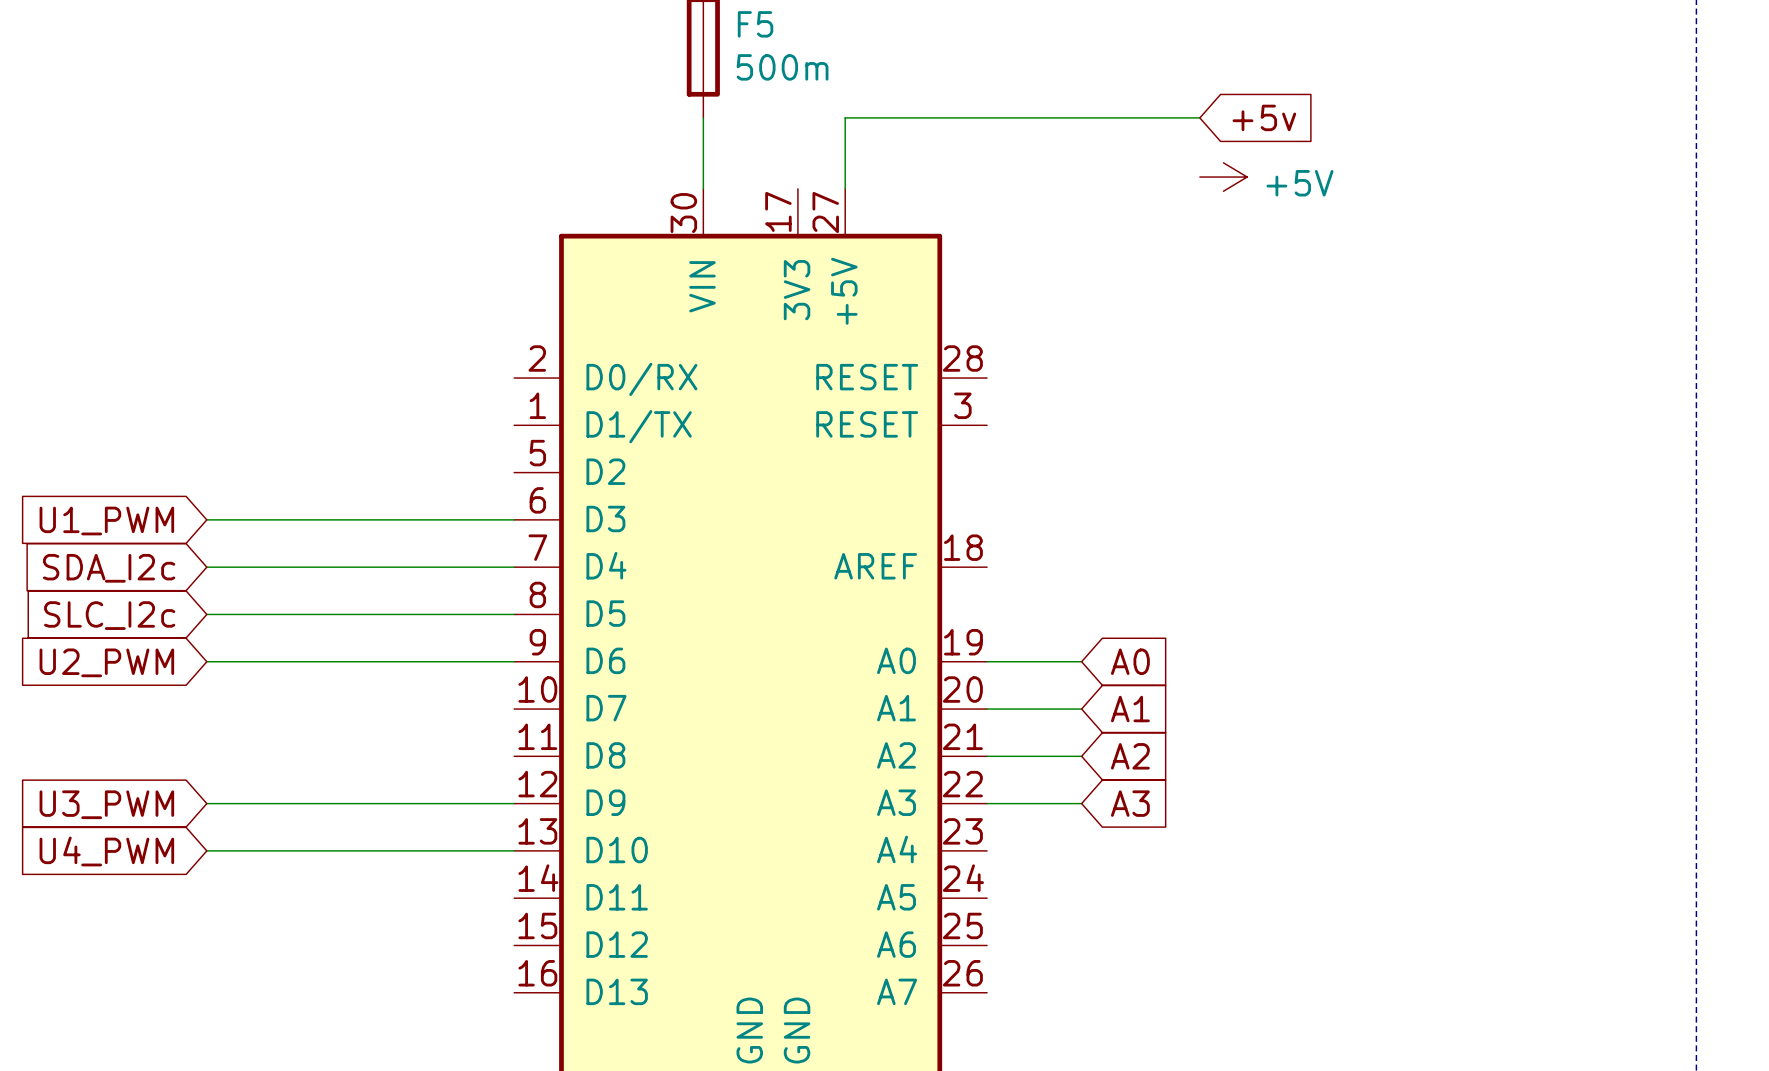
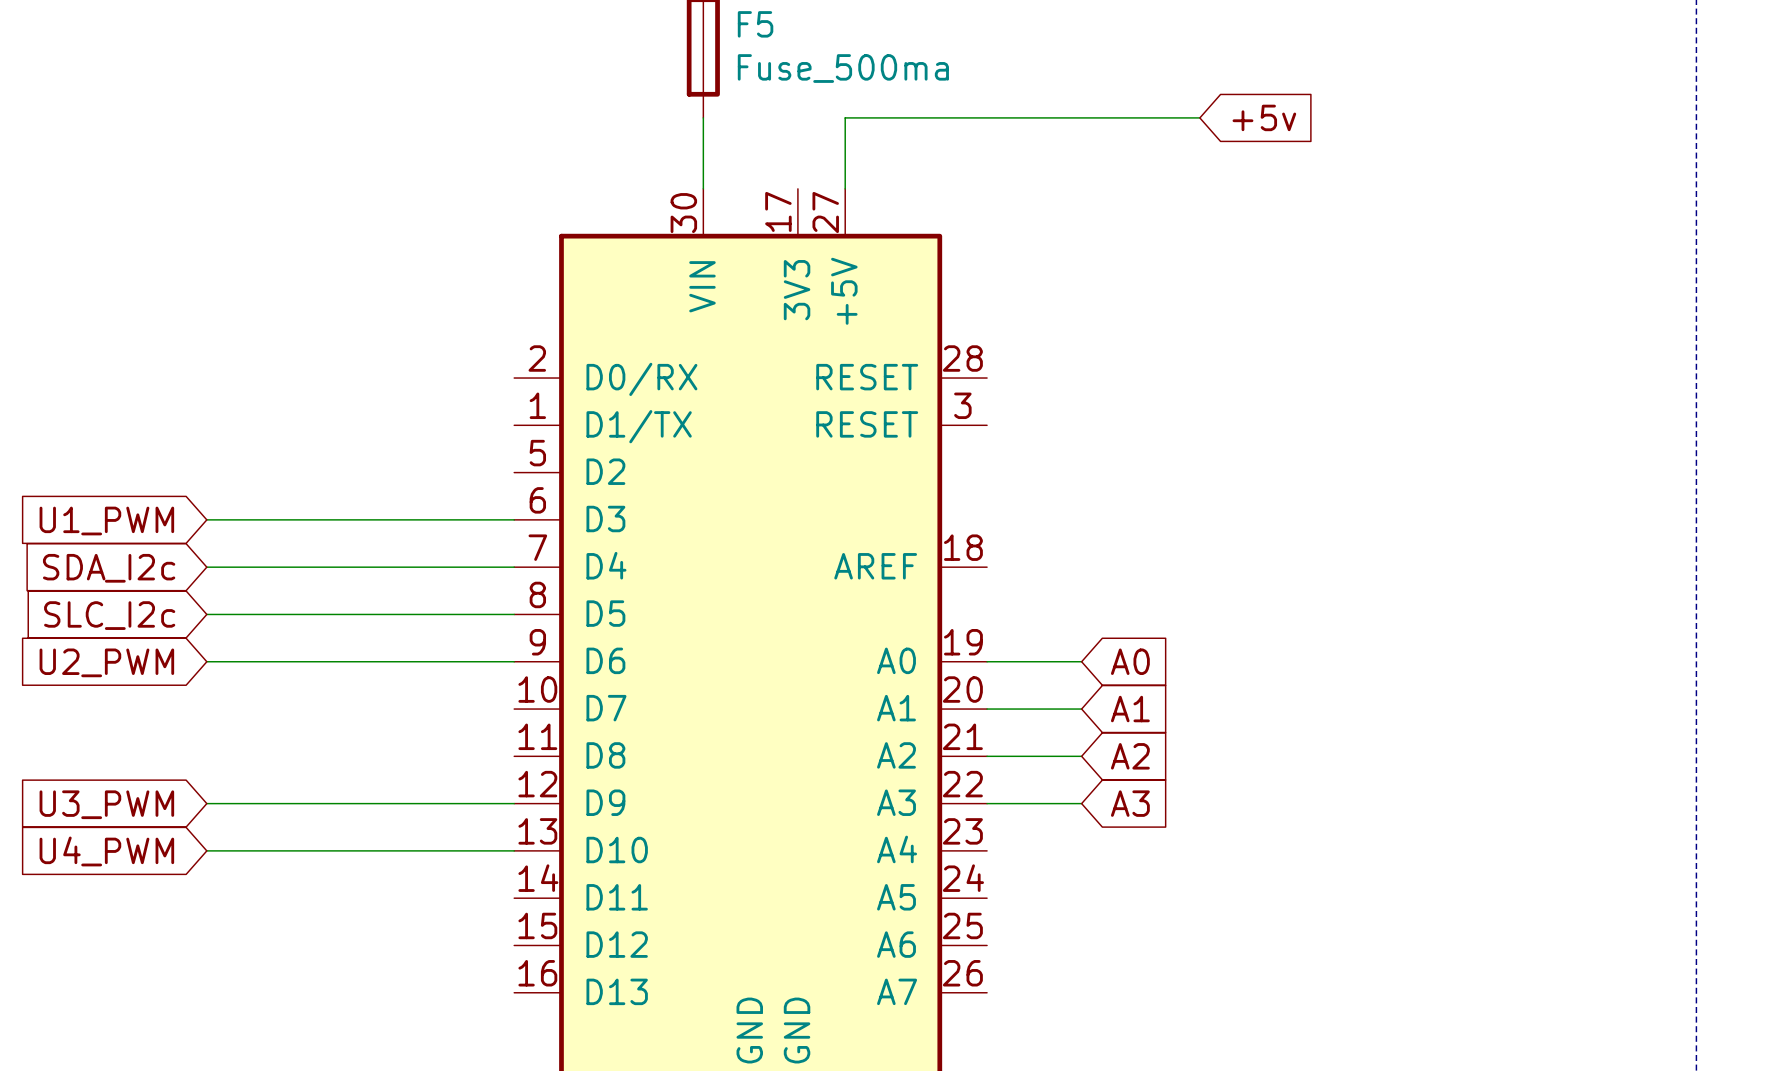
F5 value: 500m (782, 67) -> Fuse_500ma (843, 68)
power symbol: +5V (1223, 177) -> none

